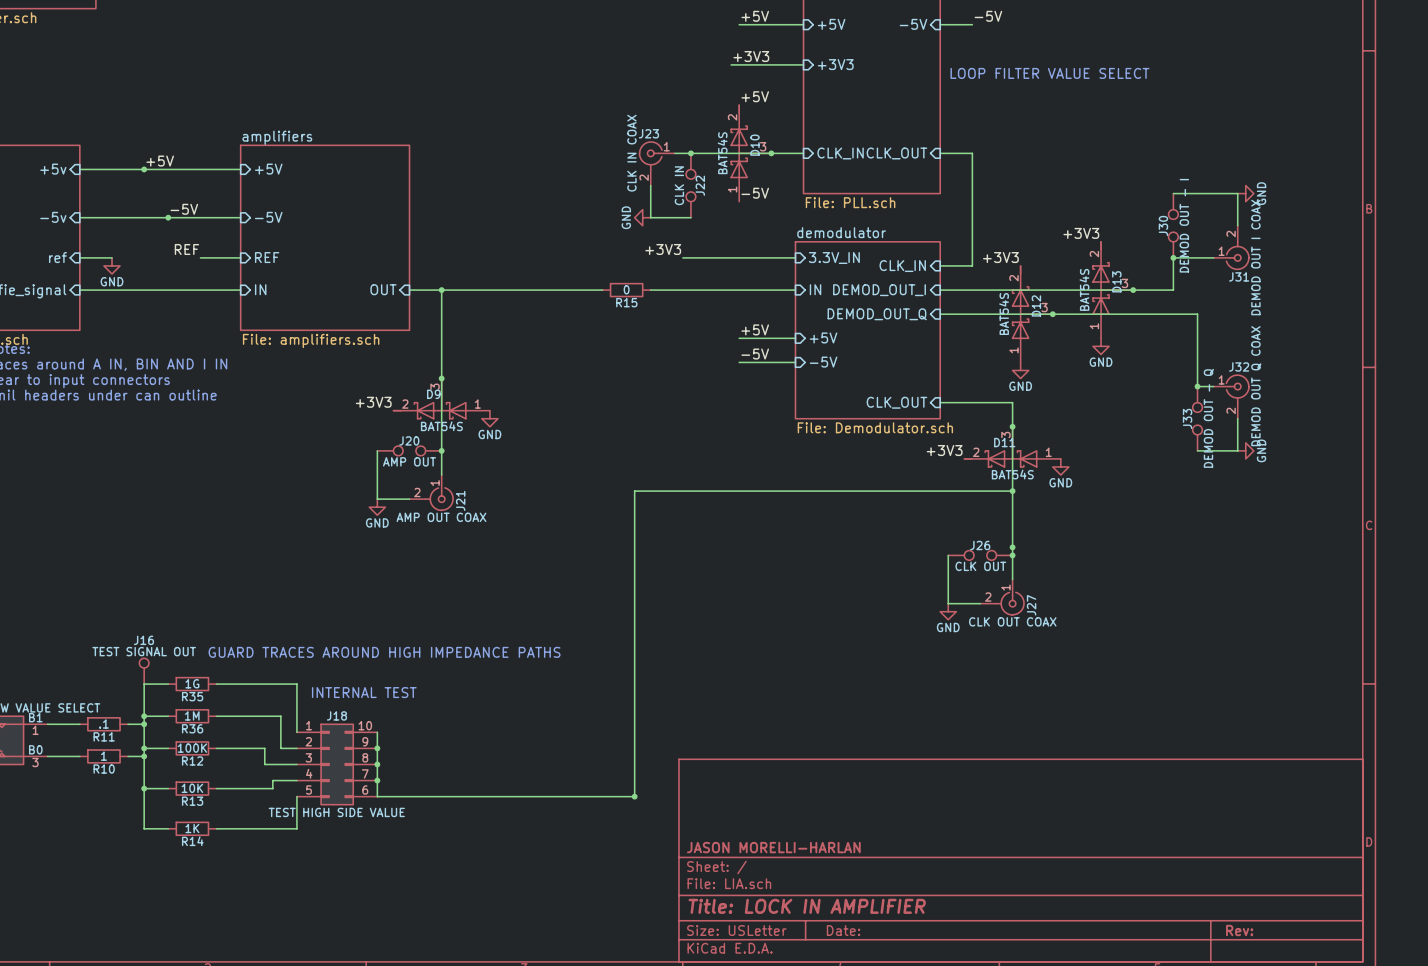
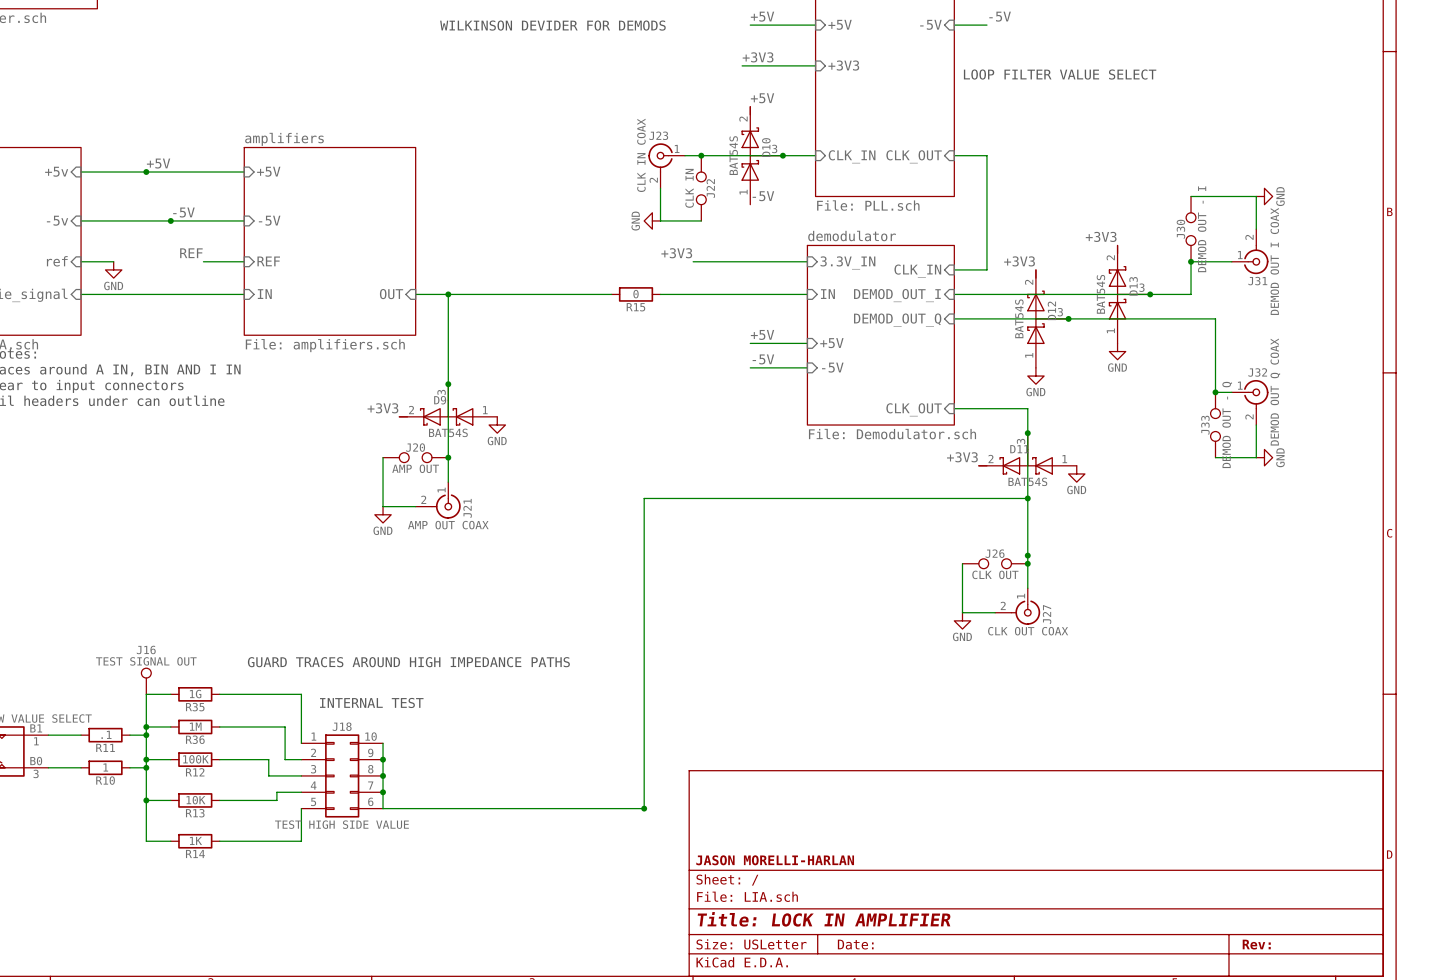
text: none -> WILKINSON DEVIDER FOR DEMODS (552, 25)

